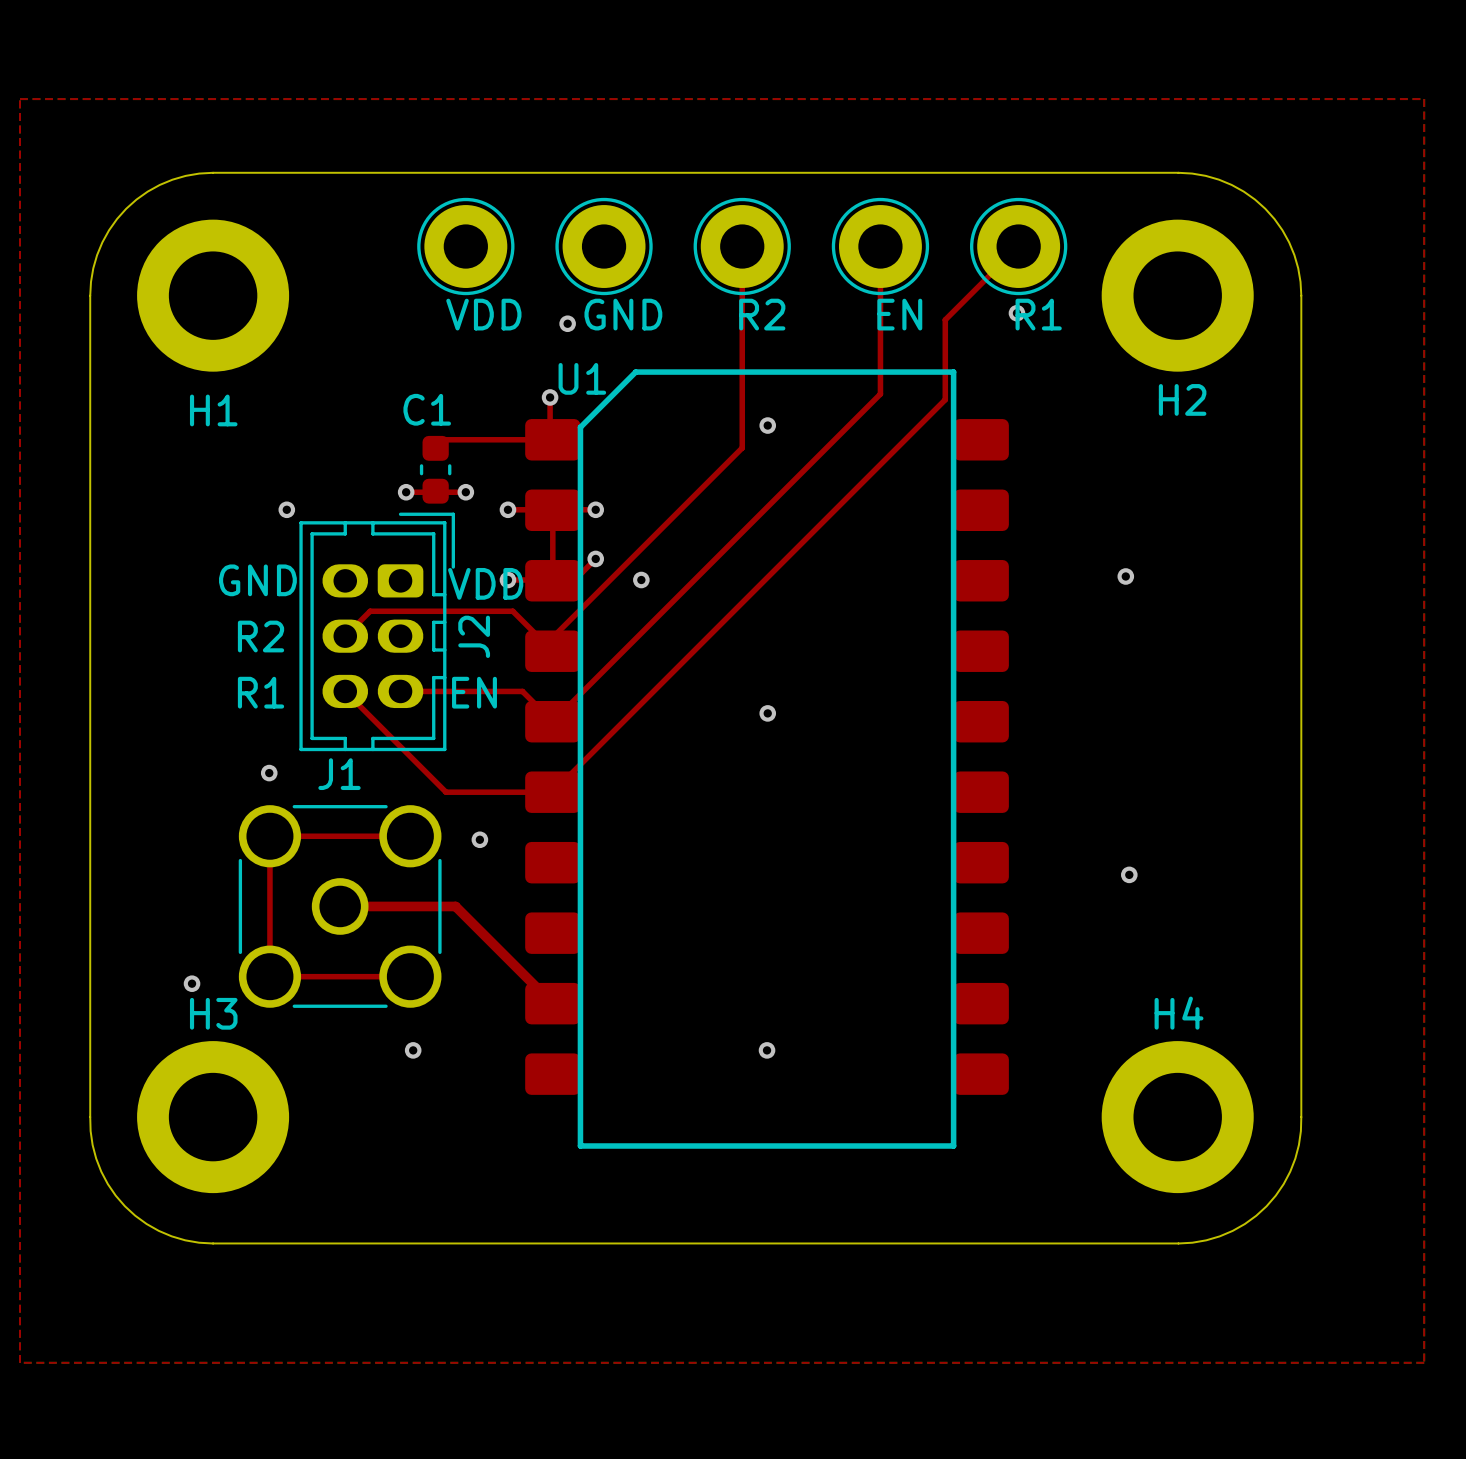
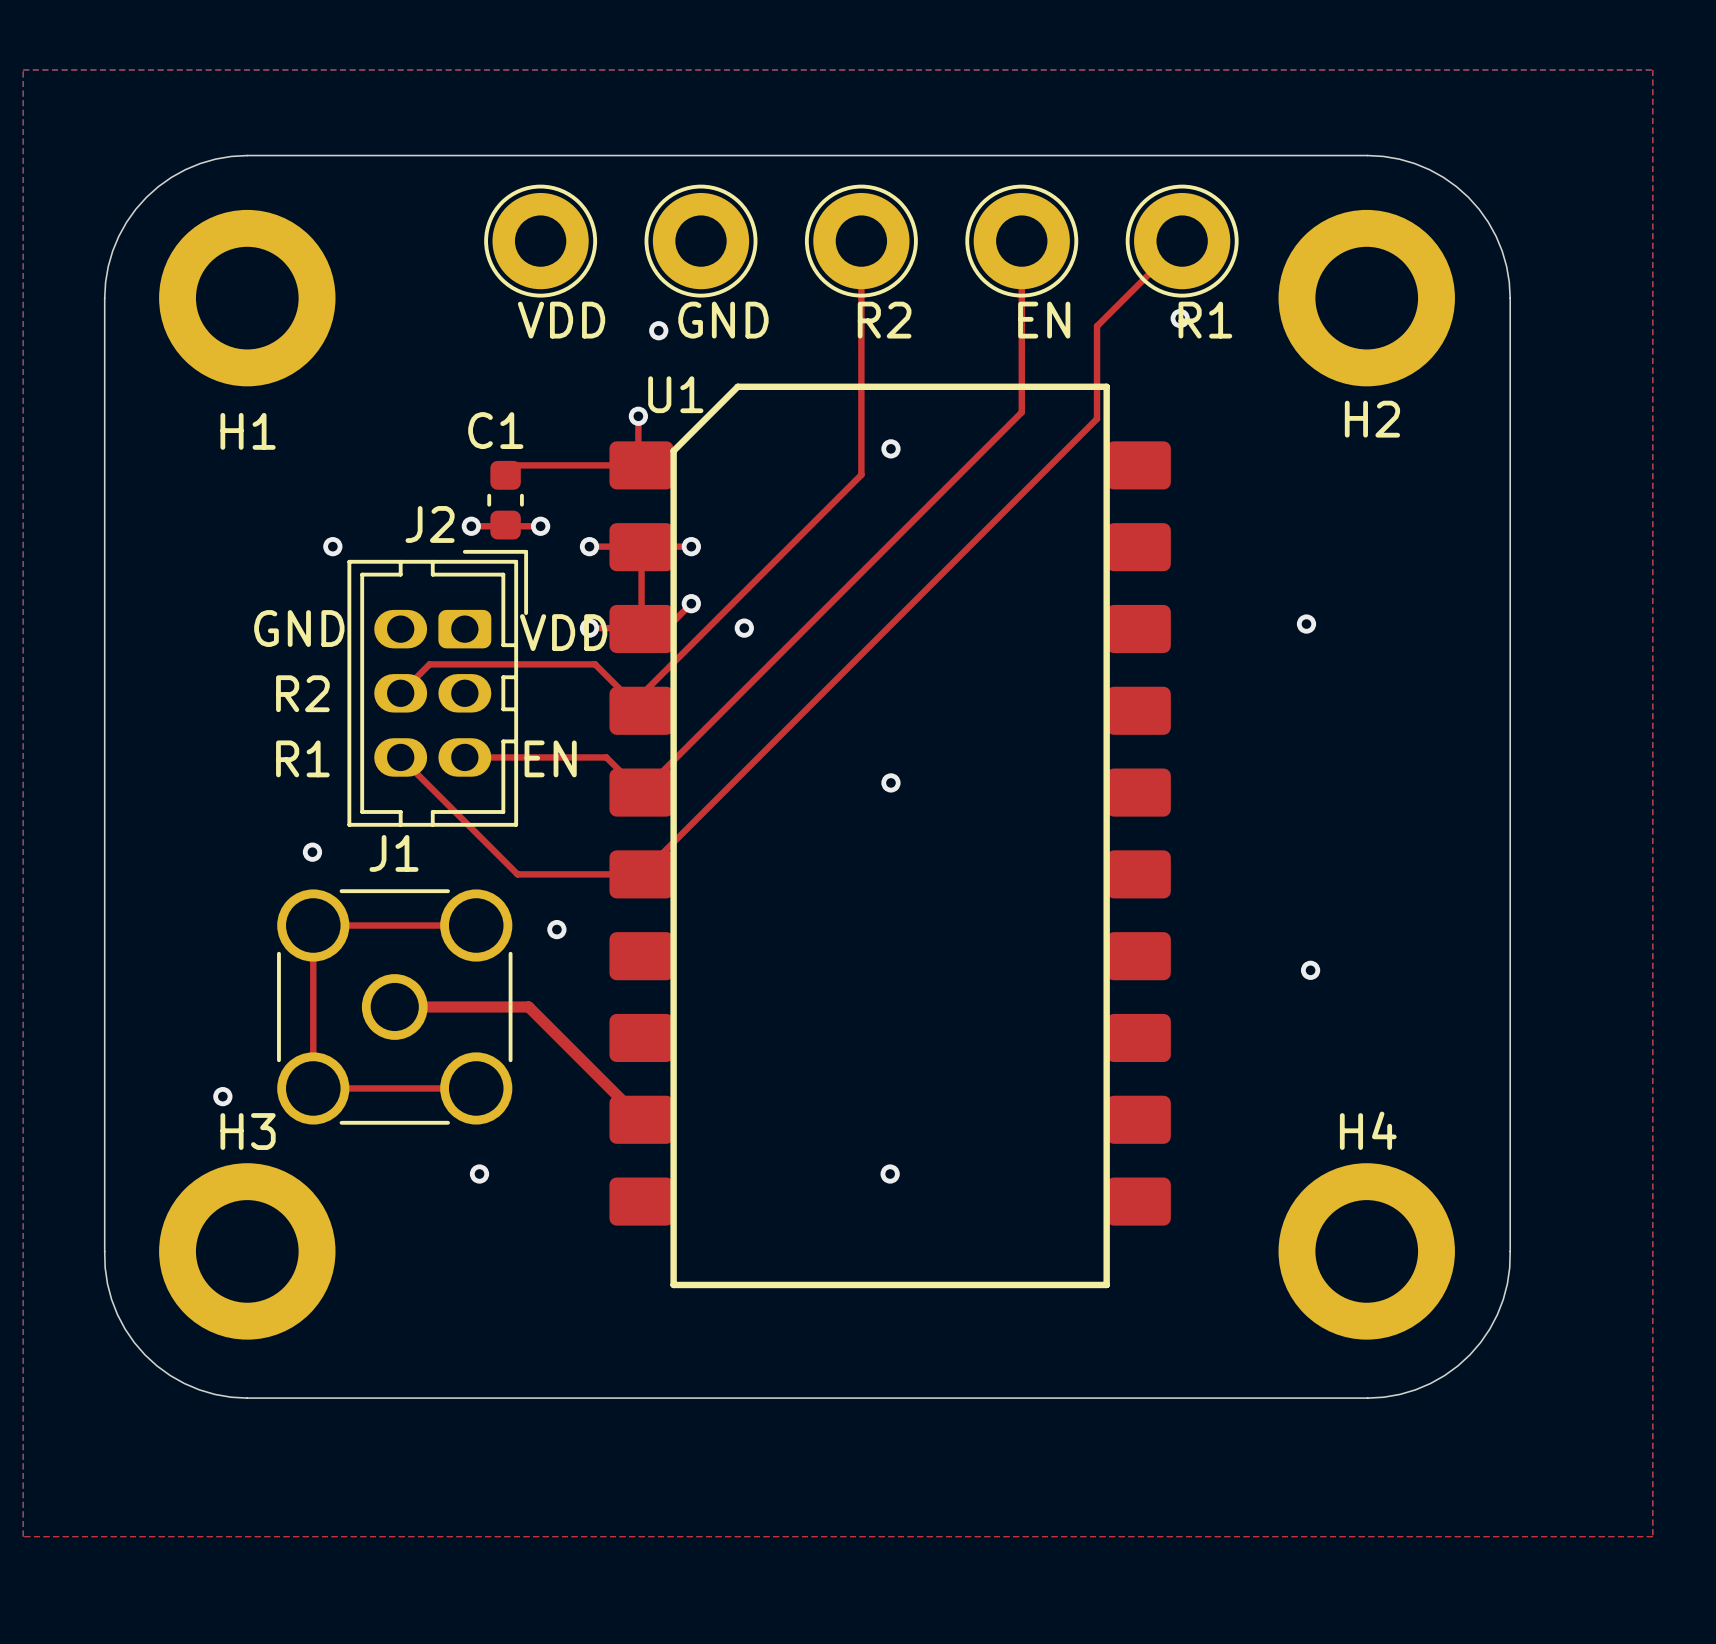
J2 name rotation: 0° (474, 636) -> 90° clockwise (430, 524)
J2 name position: J2 (474, 636) -> J2 (430, 524)

